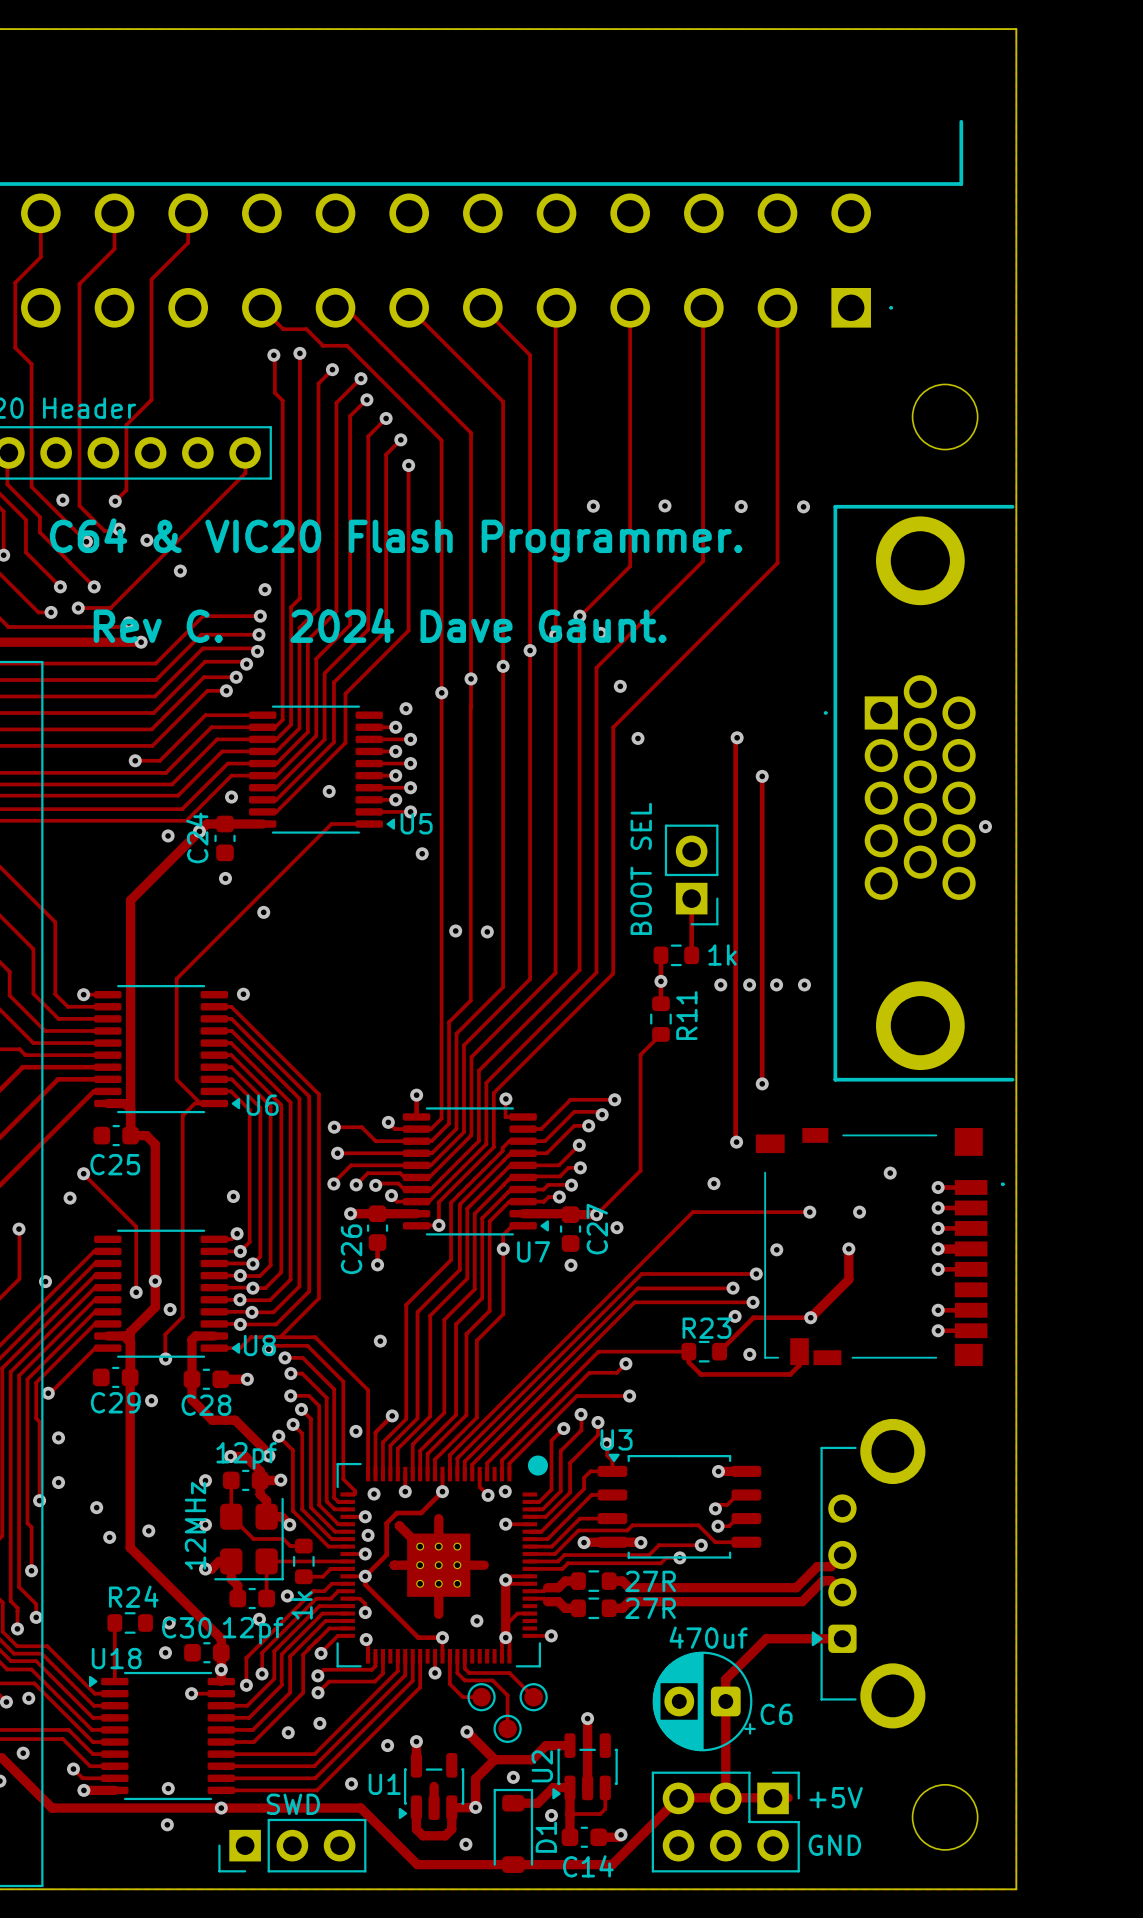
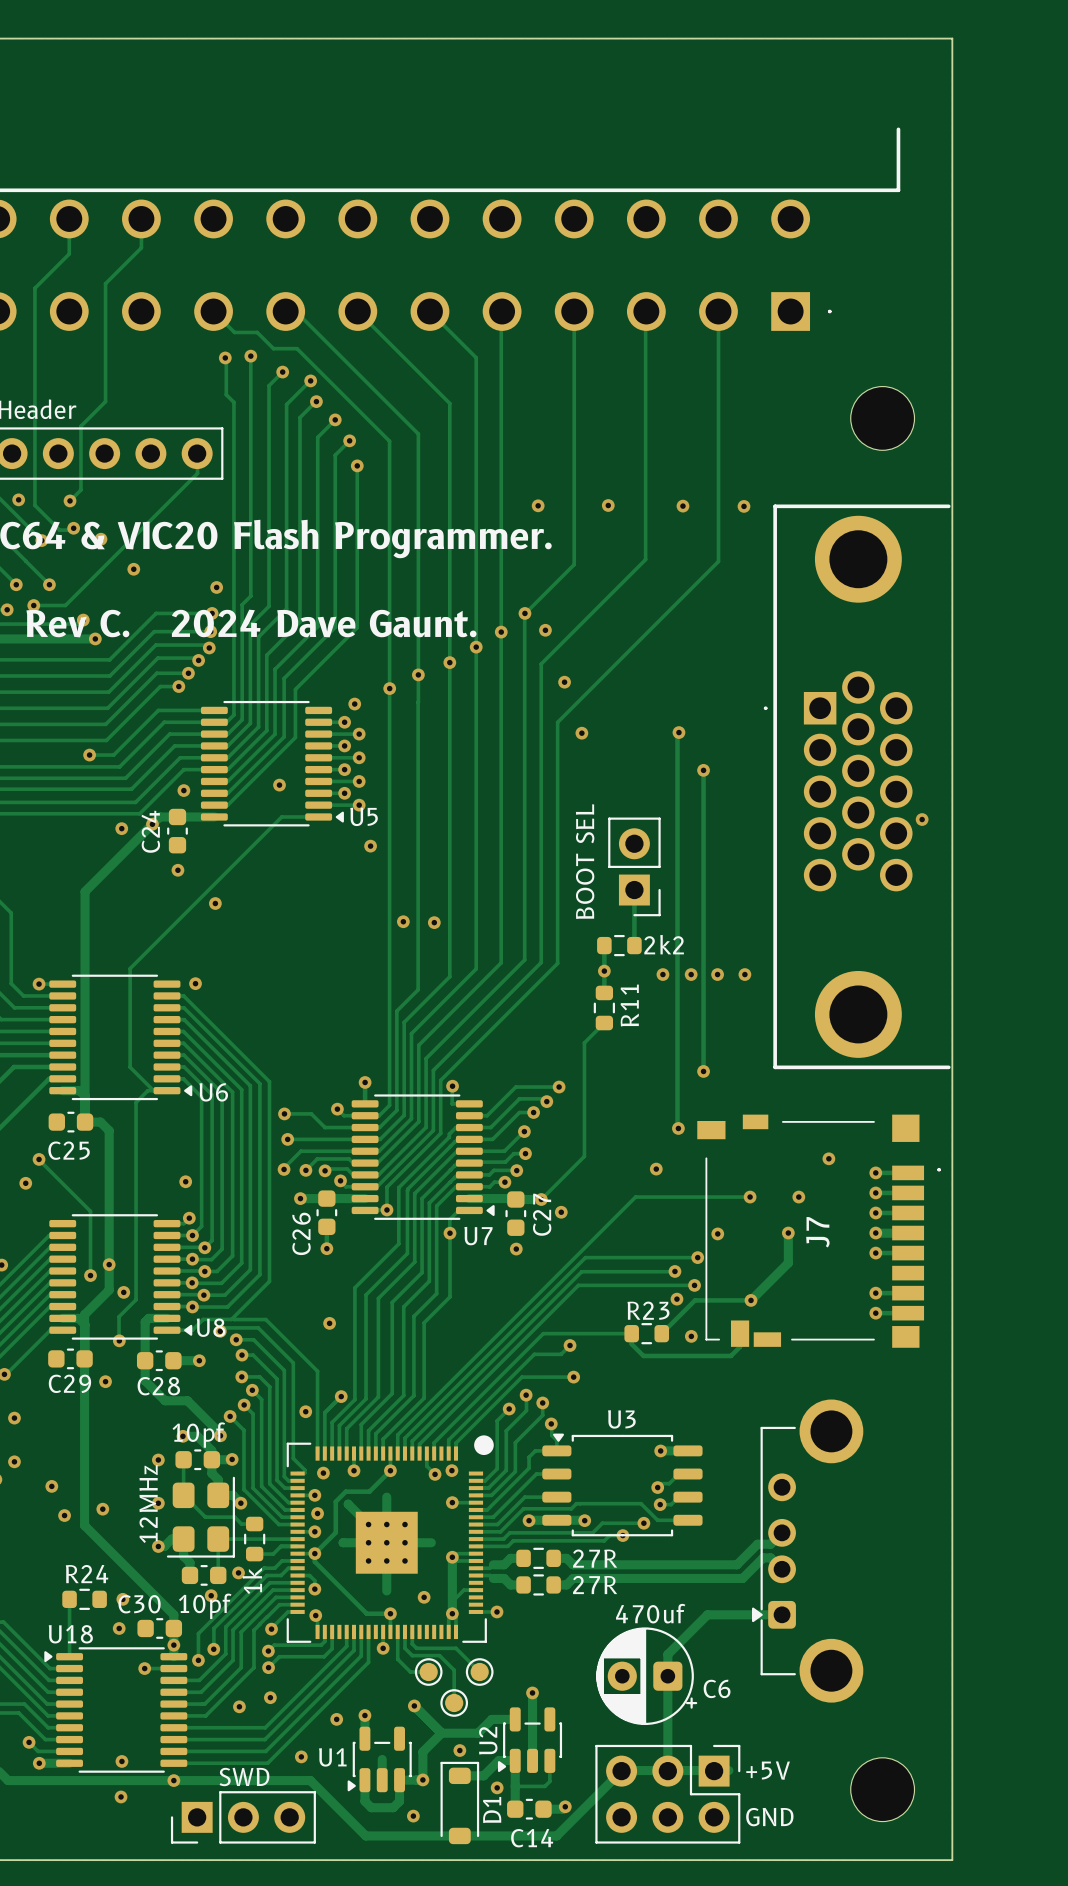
part value: 1k (722, 955) -> 2k2 (664, 944)
J7 name: none -> J7 (817, 1232)
U3 name position: U3 (616, 1439) -> U3 (621, 1419)
part value: 12pf (246, 1455) -> 10pf (198, 1435)
part value: 12pf (253, 1630) -> 10pf (205, 1606)

